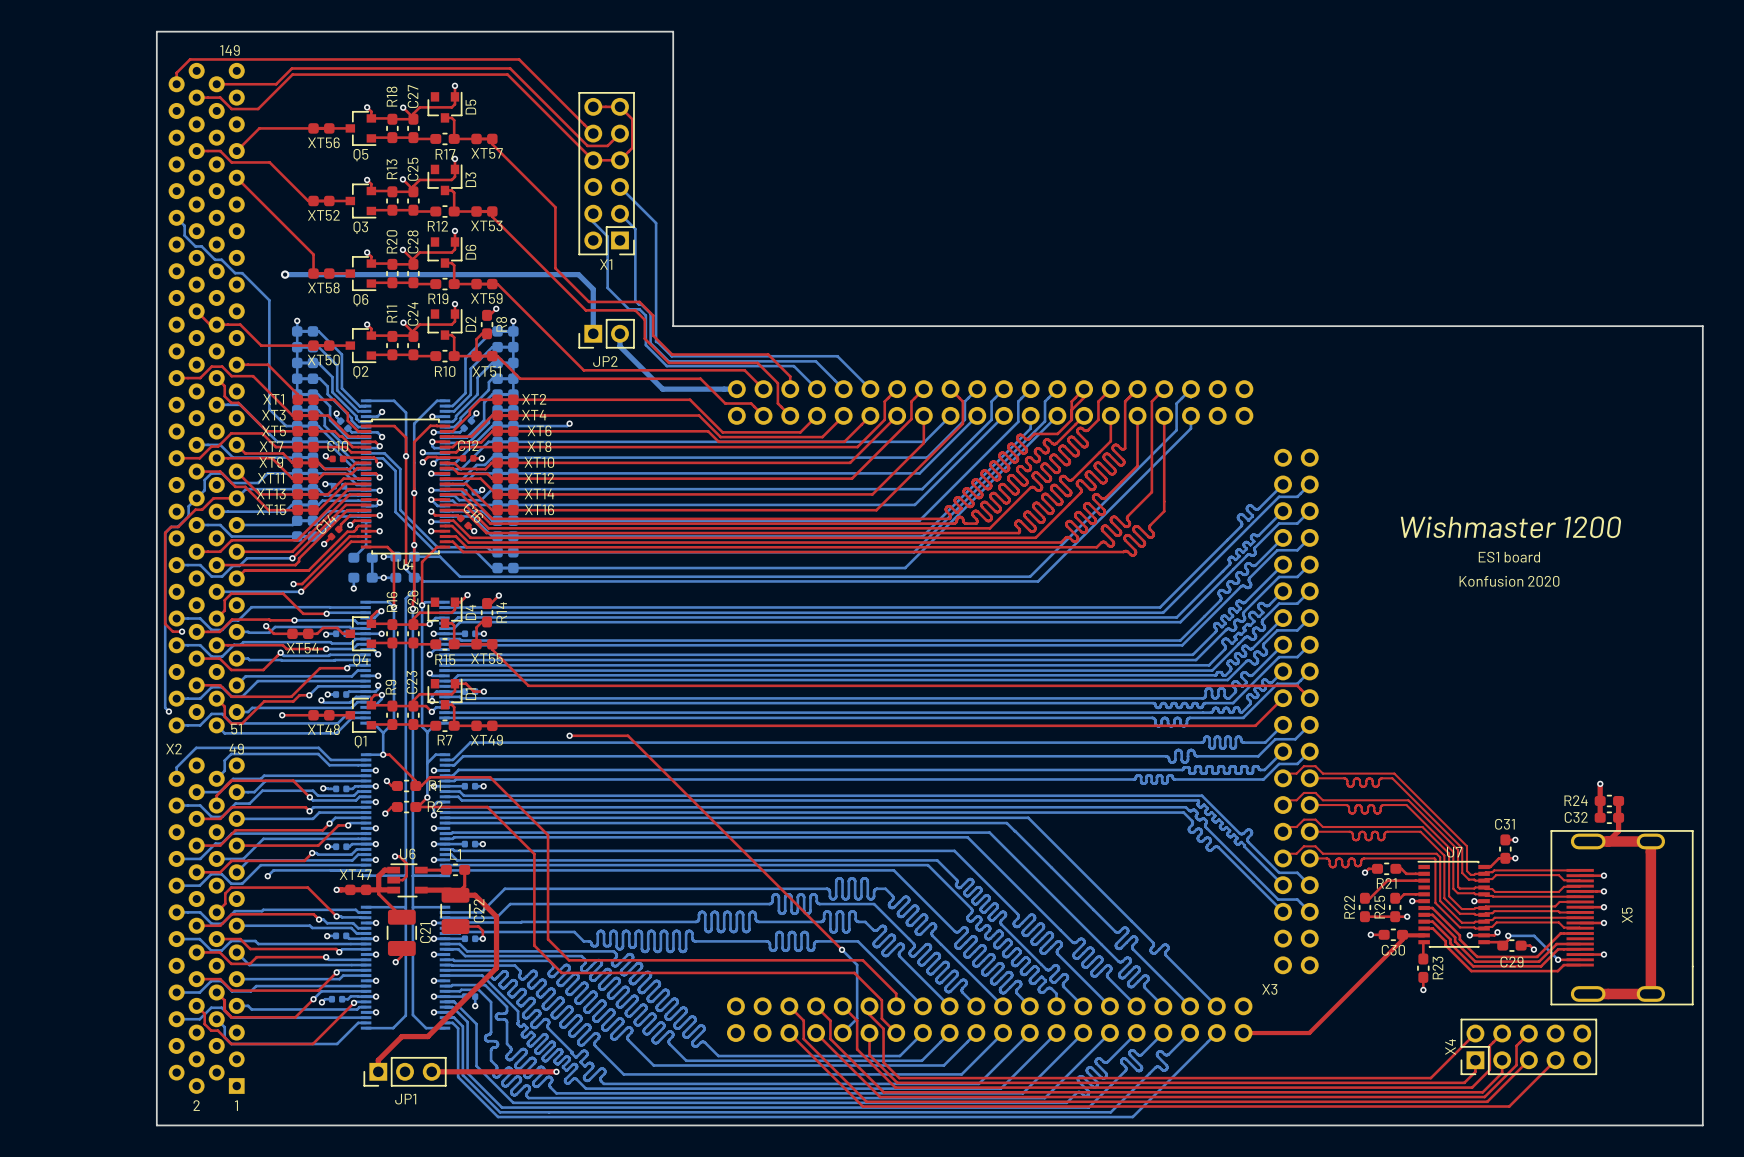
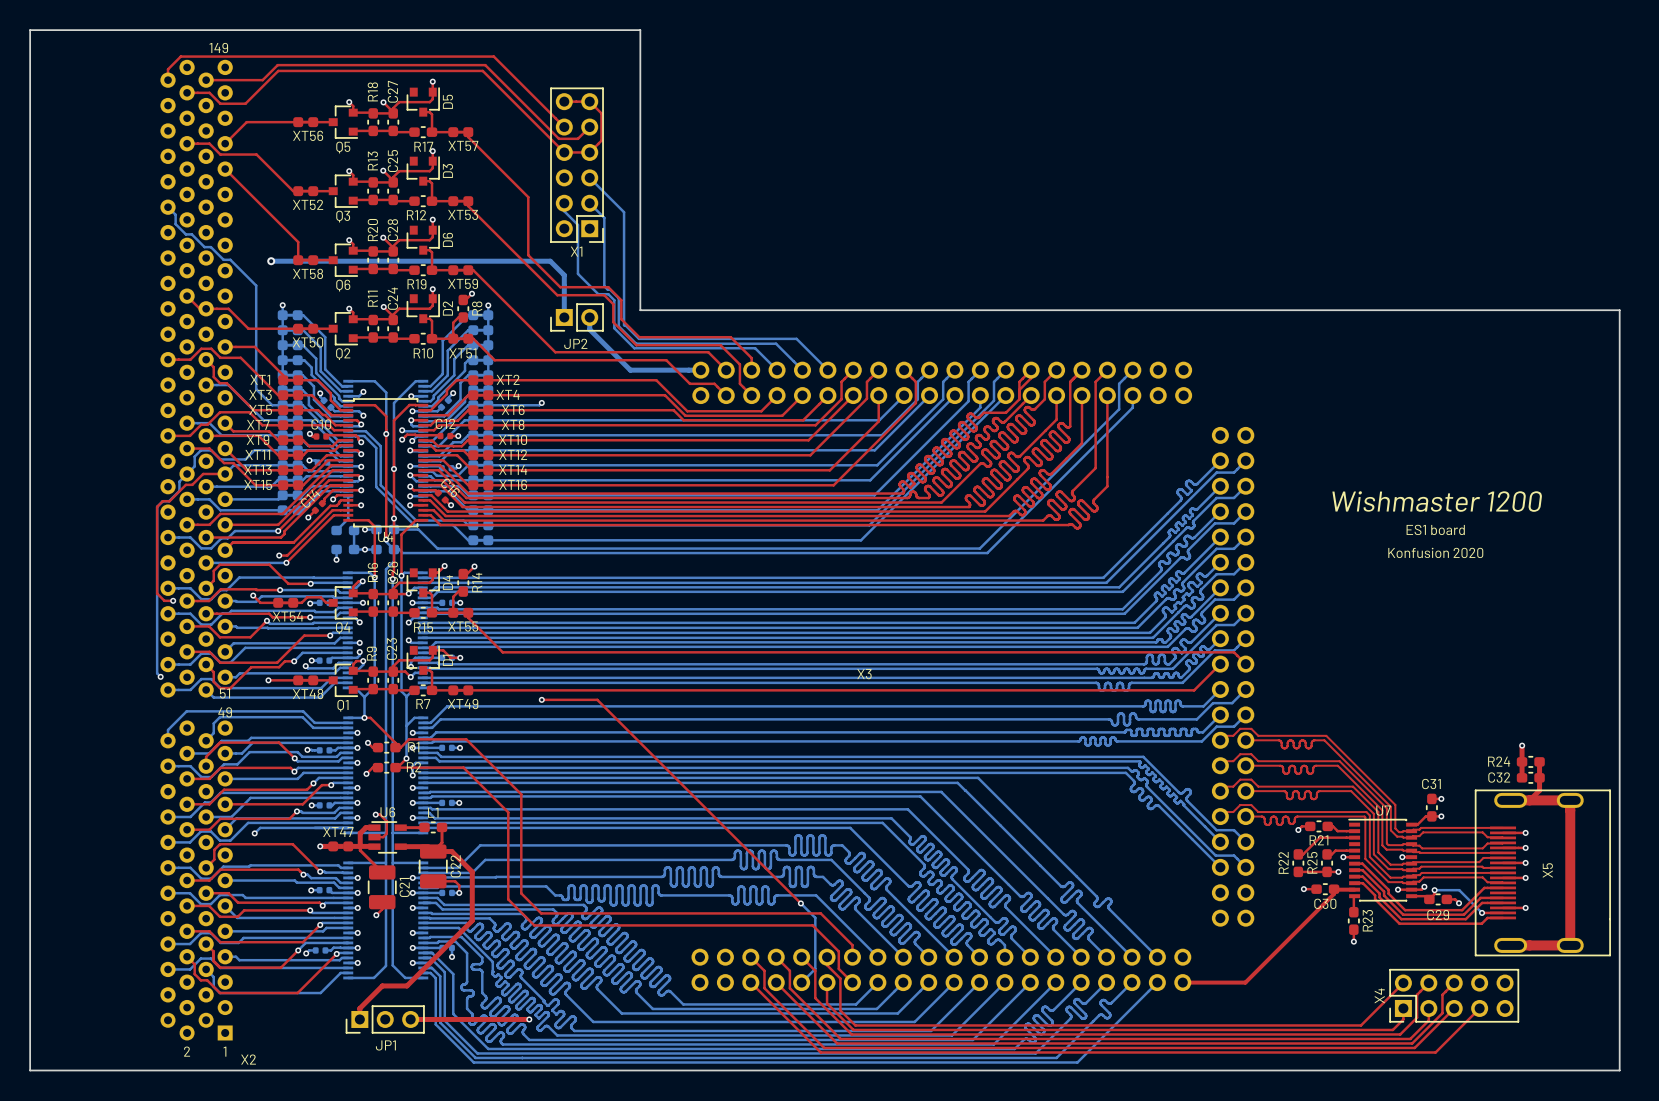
board edge: (156, 31) (156, 1125) -> (149, 30) (30, 30) (30, 1070) (149, 1070)
X2 name position: X2 (174, 749) -> X2 (248, 1059)
X3 name position: X3 (1269, 989) -> X3 (864, 674)

